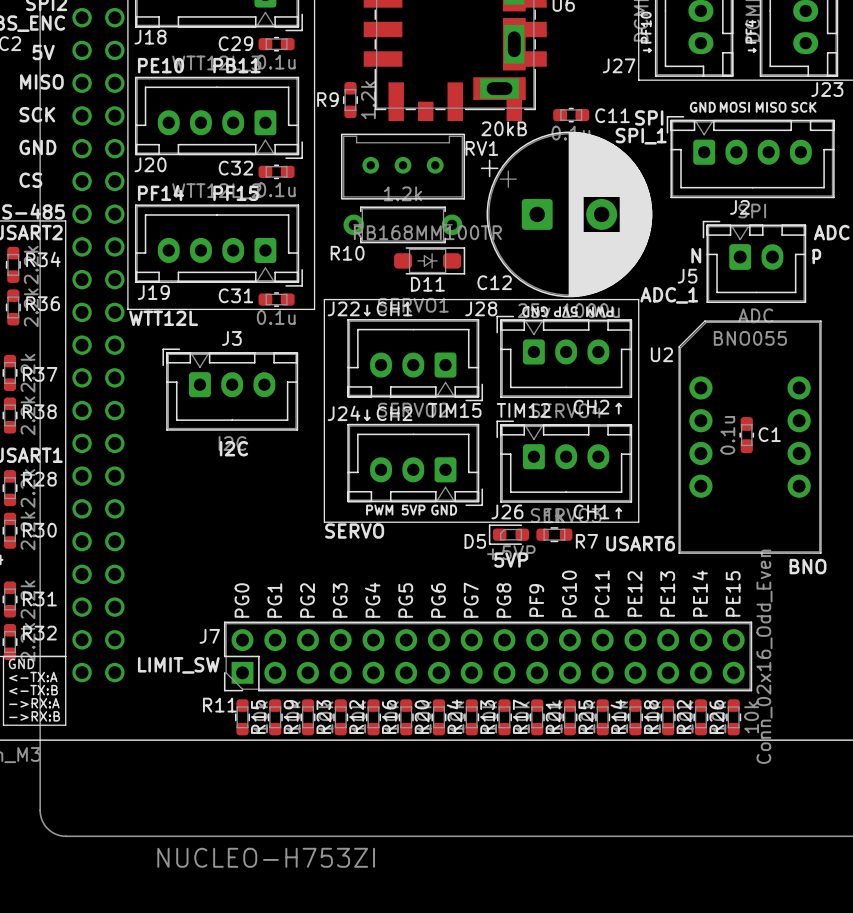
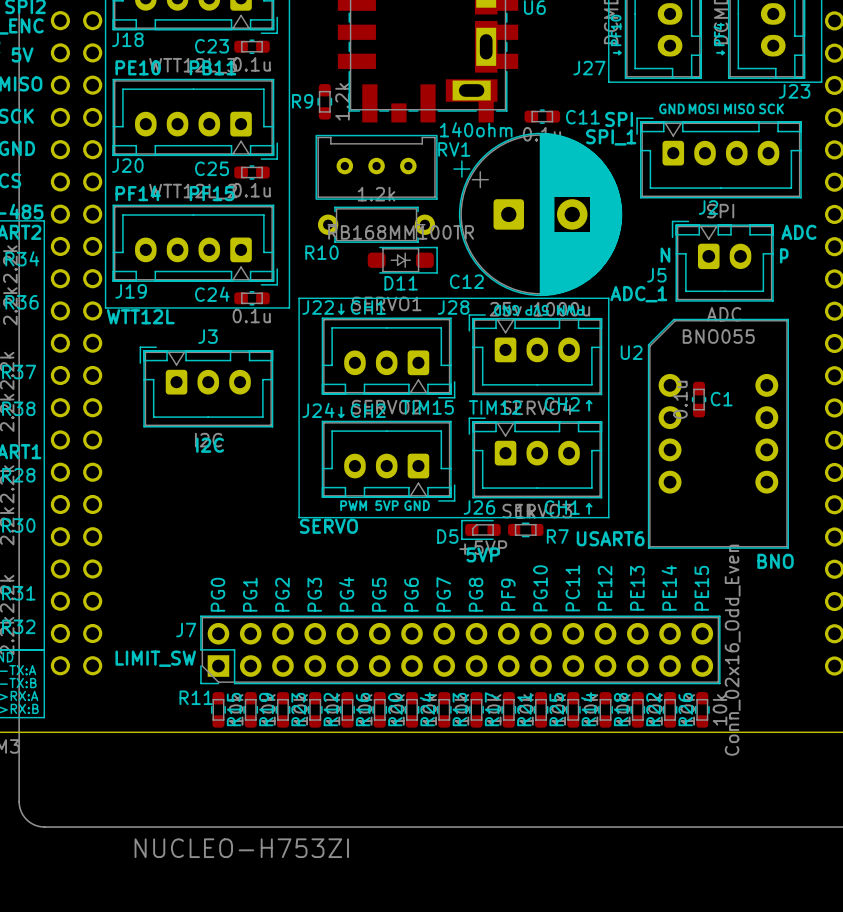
C29 name: C29 (235, 43) -> C23 (212, 46)
RV1 value: 20kB (504, 128) -> 140ohm (476, 129)
C32 name: C32 (235, 168) -> C25 (212, 168)
C31 name: C31 (235, 295) -> C24 (212, 294)
C1 position: (746, 435) -> (699, 399)

